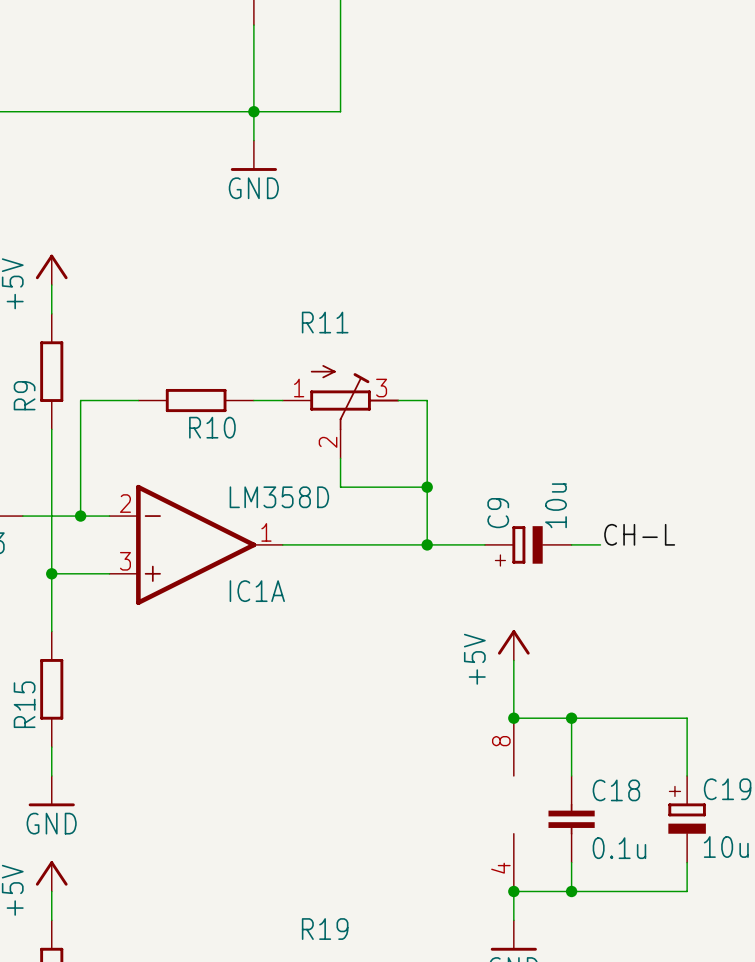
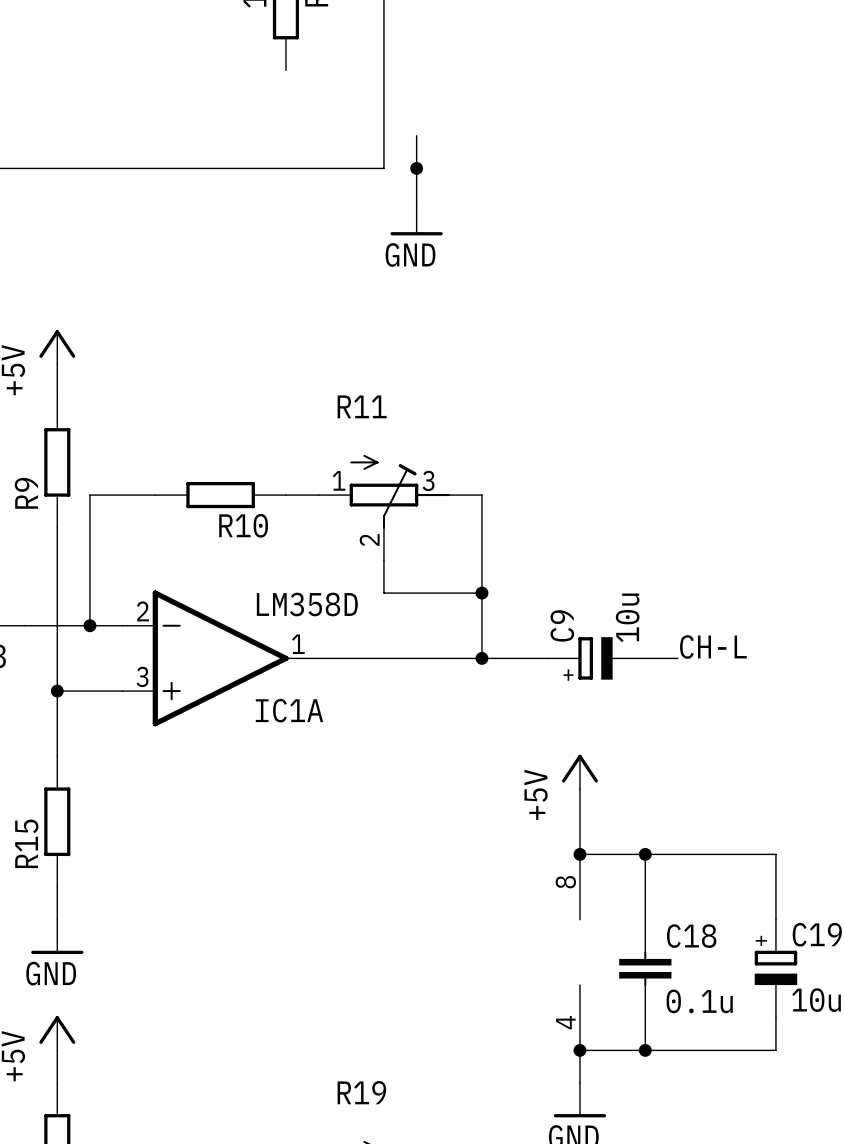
wire: (253, 25) (253, 140) -> none
wire: none -> (416, 135) (416, 201)
junction: (253, 111) -> none
junction: none -> (416, 168)
power symbol position: GND (253, 155) -> GND (416, 218)

